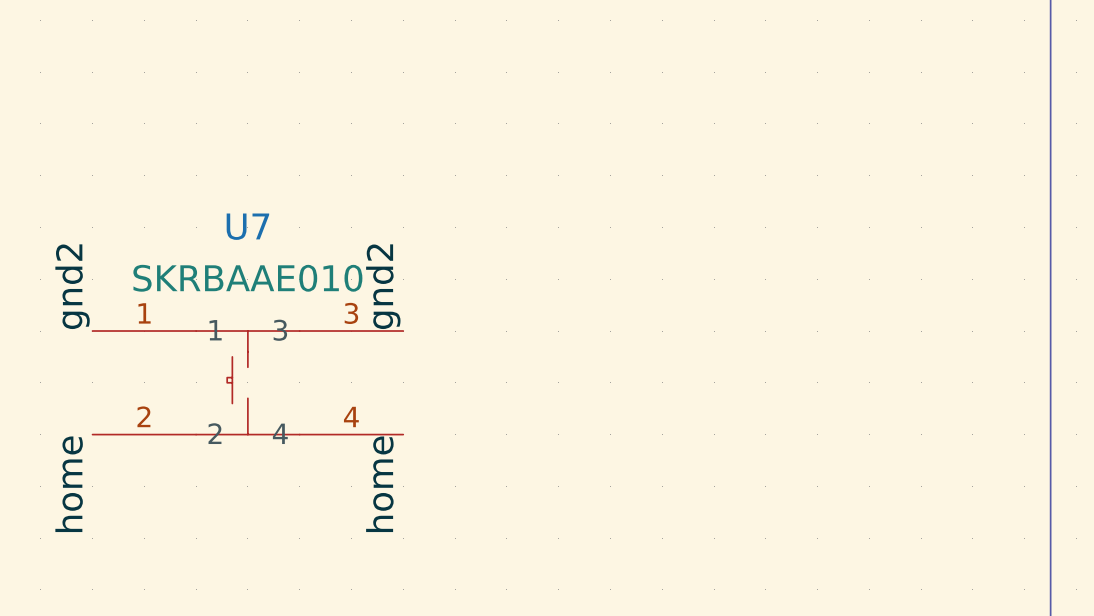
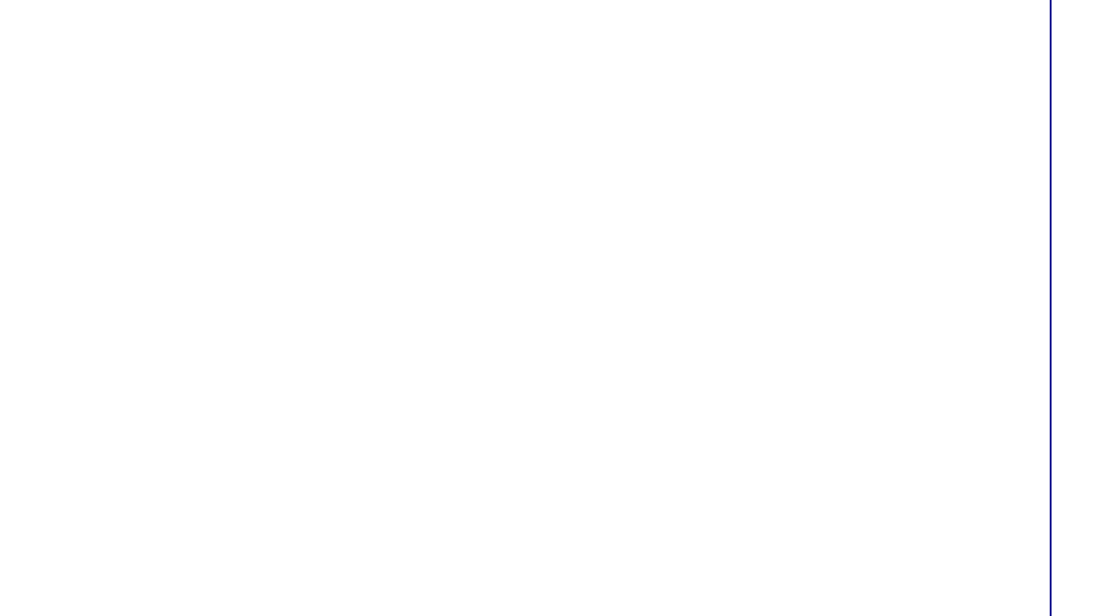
label: gnd2 (72, 286) -> none
label: gnd2 (383, 286) -> none
U7: SKRBAAE010 (247, 382) -> none
label: home (69, 484) -> none
label: home (379, 484) -> none

